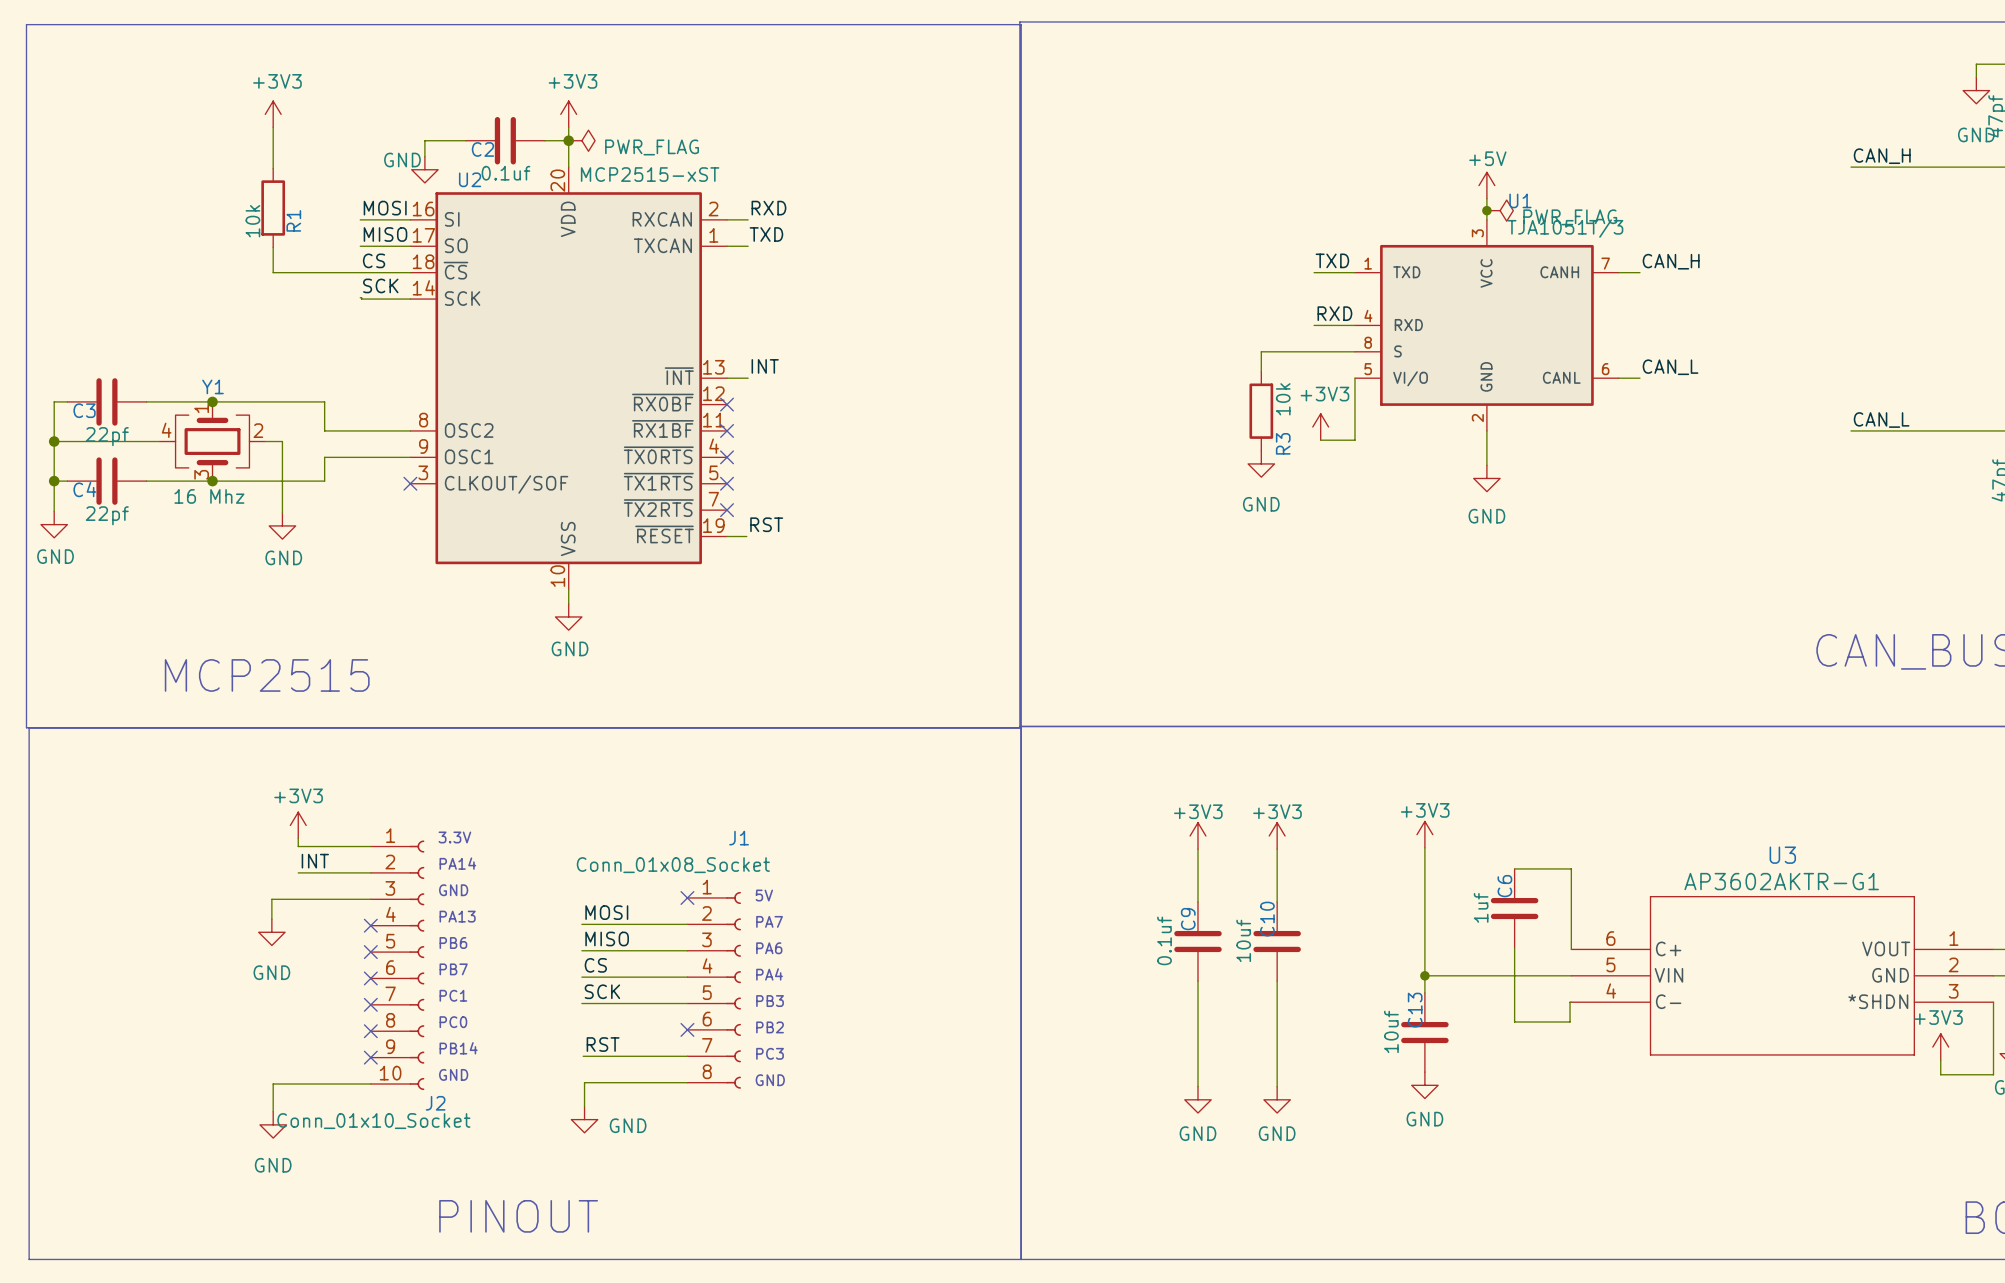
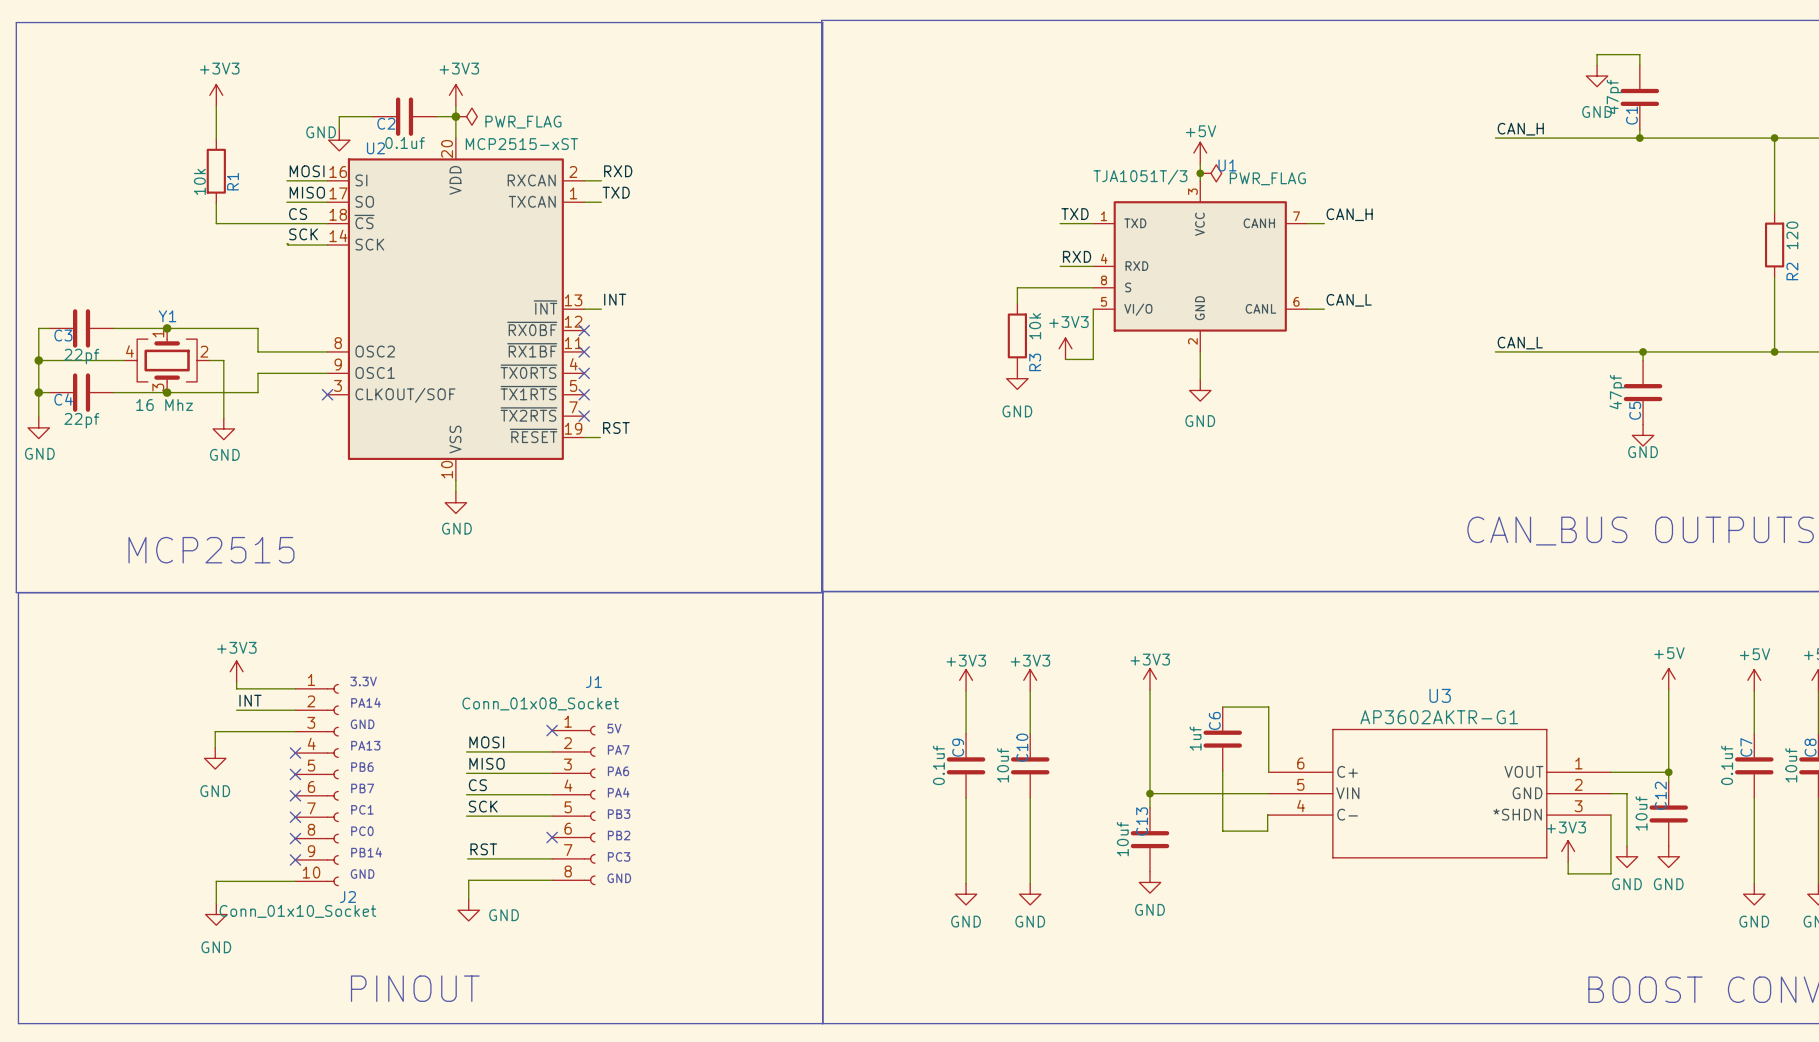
U1 value position: TJA1051T/3 (1565, 228) -> TJA1051T/3 (1140, 177)

